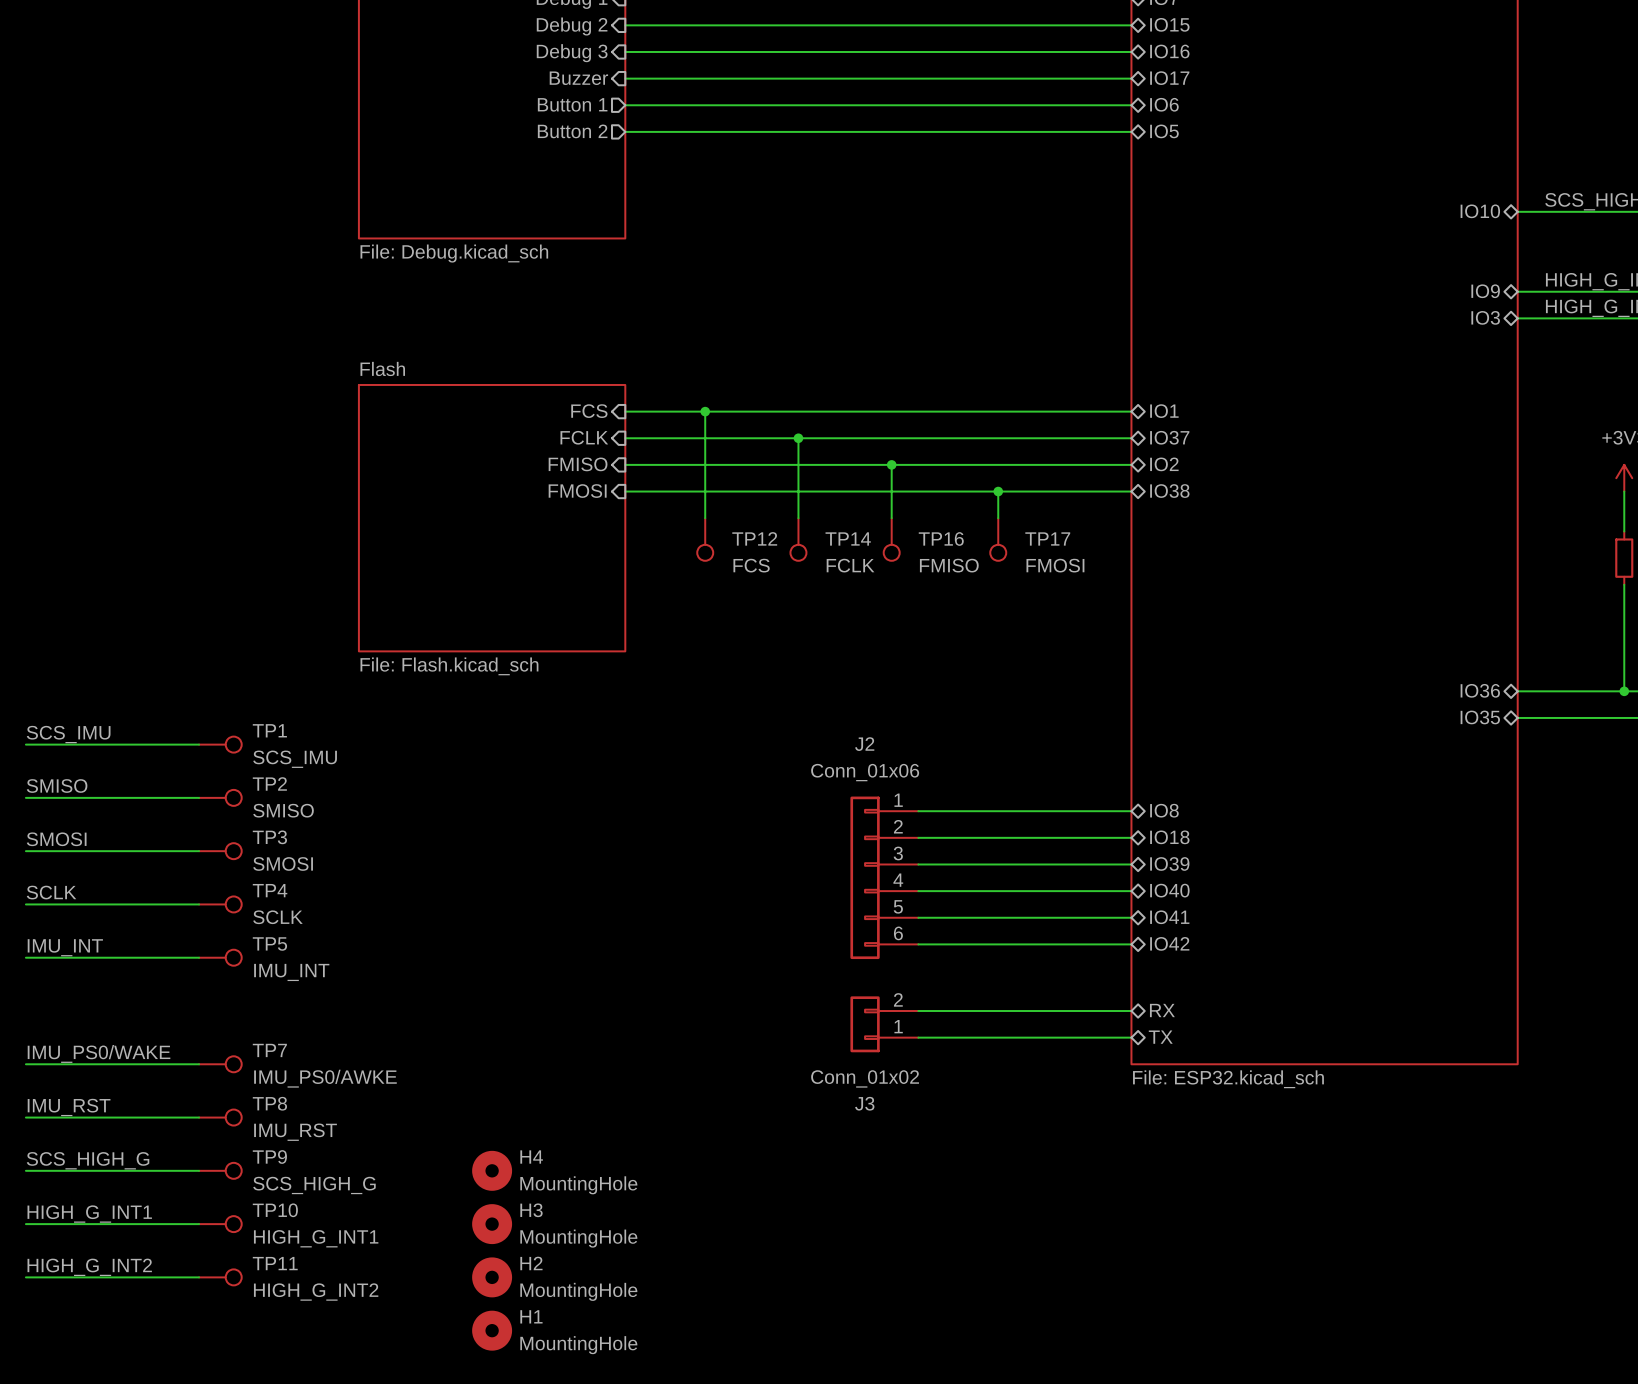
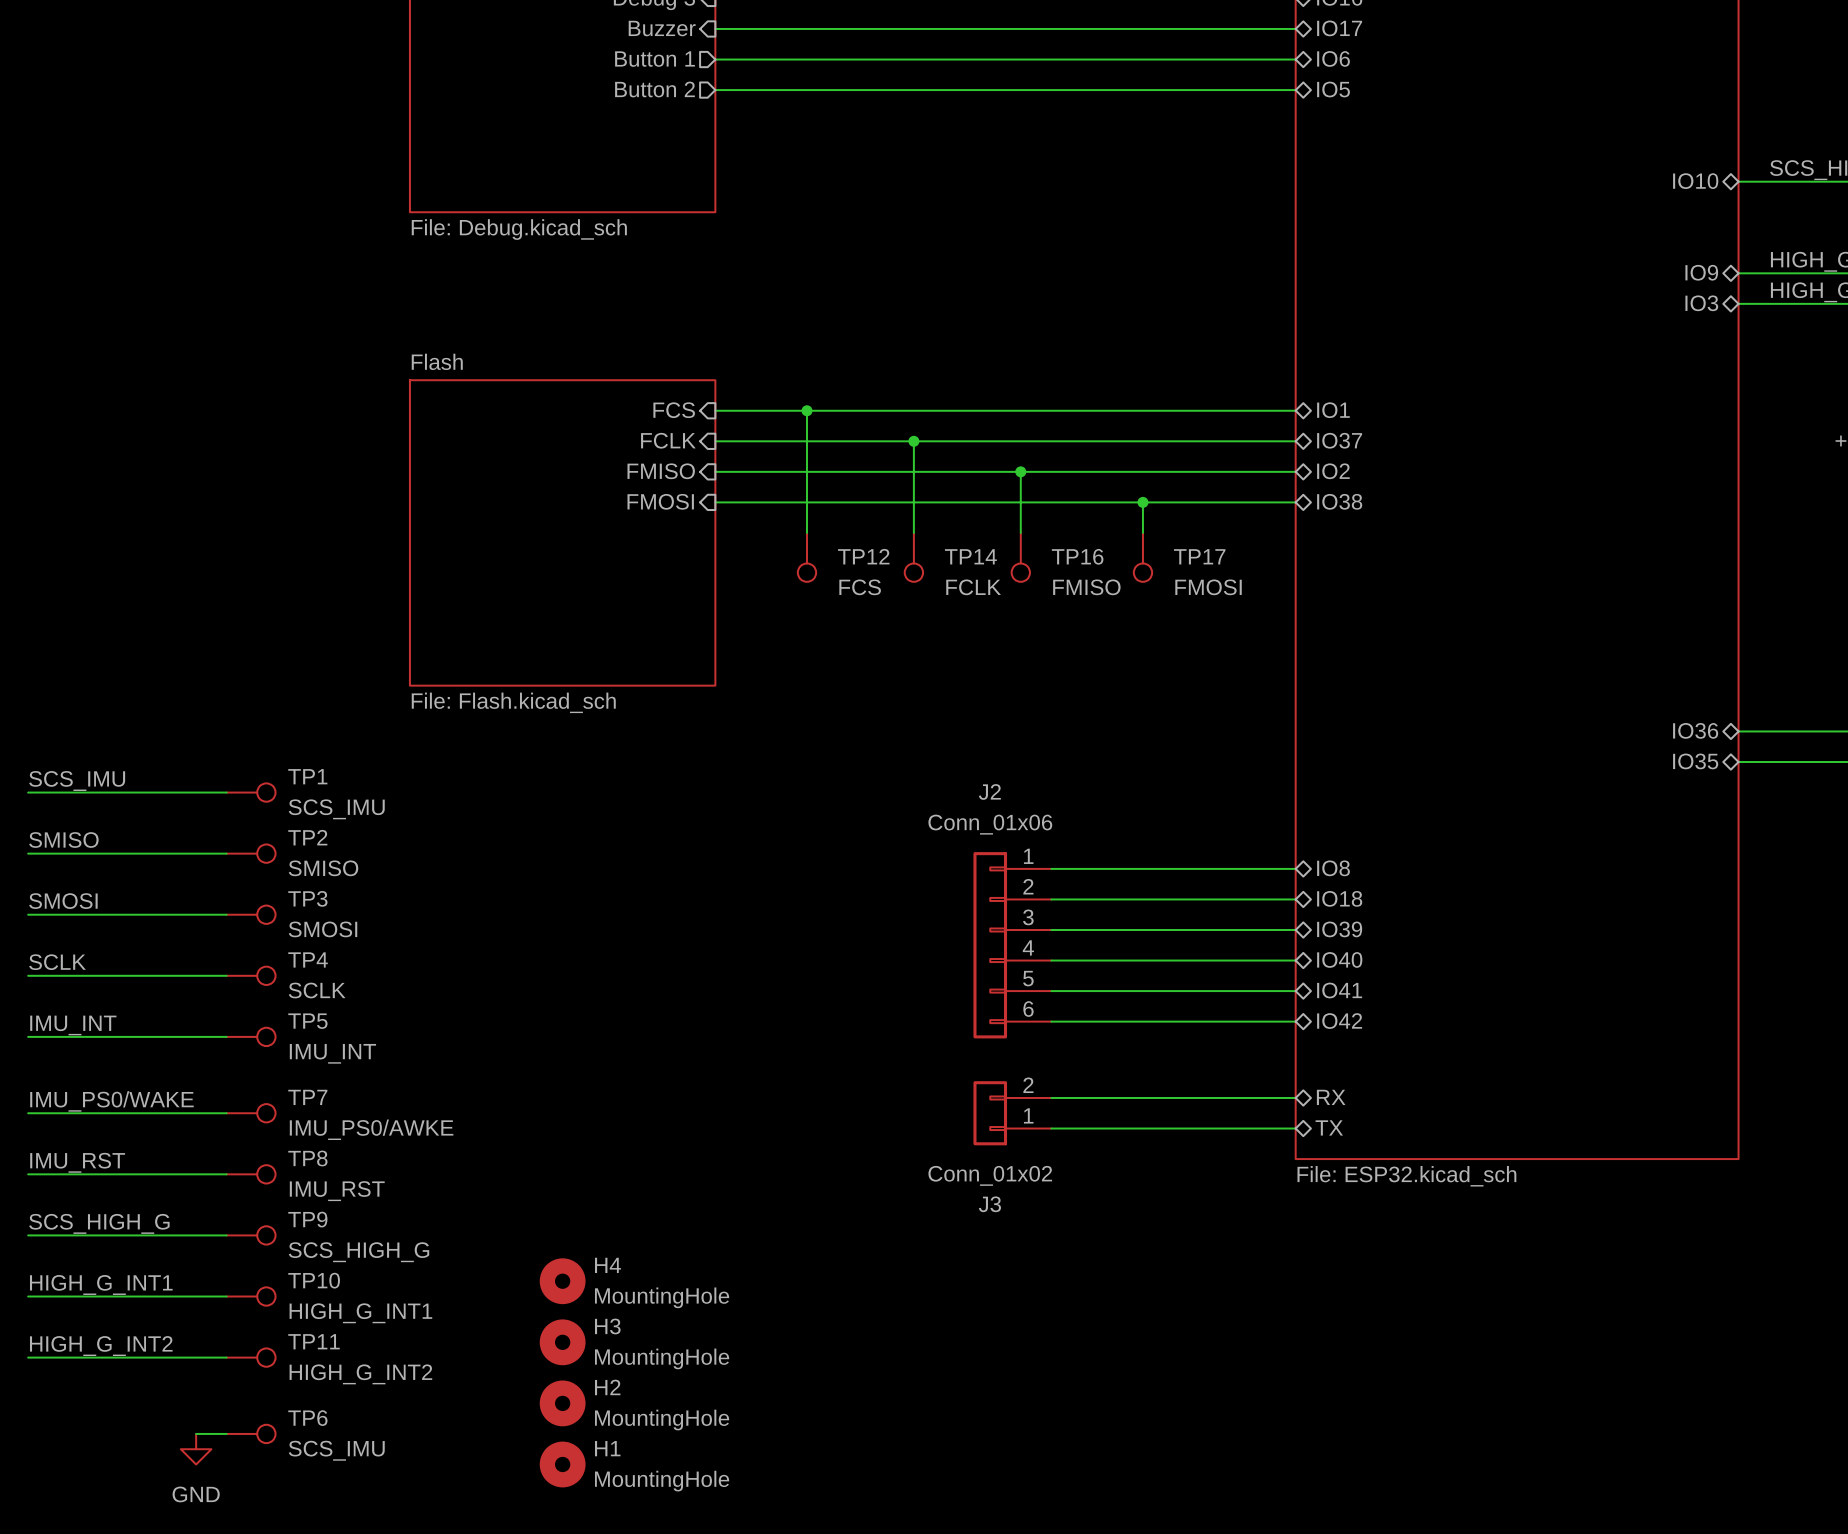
label position: IMU_PS0/WAKE (99, 1053) -> IMU_PS0/WAKE (111, 1101)
wire: (25, 1064) (199, 1064) -> (28, 1113) (226, 1113)
TP7 position: (220, 1064) -> (251, 1113)
label position: IMU_RST (69, 1107) -> IMU_RST (77, 1162)
wire: (25, 1117) (199, 1117) -> (28, 1174) (226, 1174)
TP8 position: (220, 1117) -> (251, 1174)
label position: SCS_HIGH_G (88, 1160) -> SCS_HIGH_G (99, 1223)
wire: (25, 1170) (199, 1170) -> (28, 1235) (226, 1235)
TP9 position: (220, 1170) -> (251, 1235)
label position: HIGH_G_INT1 (89, 1214) -> HIGH_G_INT1 (101, 1284)
wire: (25, 1224) (199, 1224) -> (28, 1296) (226, 1296)
TP10 position: (220, 1224) -> (251, 1296)
label position: HIGH_G_INT2 (89, 1267) -> HIGH_G_INT2 (101, 1346)
wire: (25, 1277) (199, 1277) -> (28, 1357) (226, 1357)
TP11 position: (220, 1277) -> (251, 1357)
wire: none -> (196, 1433) (226, 1433)
TP6: none -> SCS_IMU (251, 1433)
power symbol: none -> GND (196, 1449)

